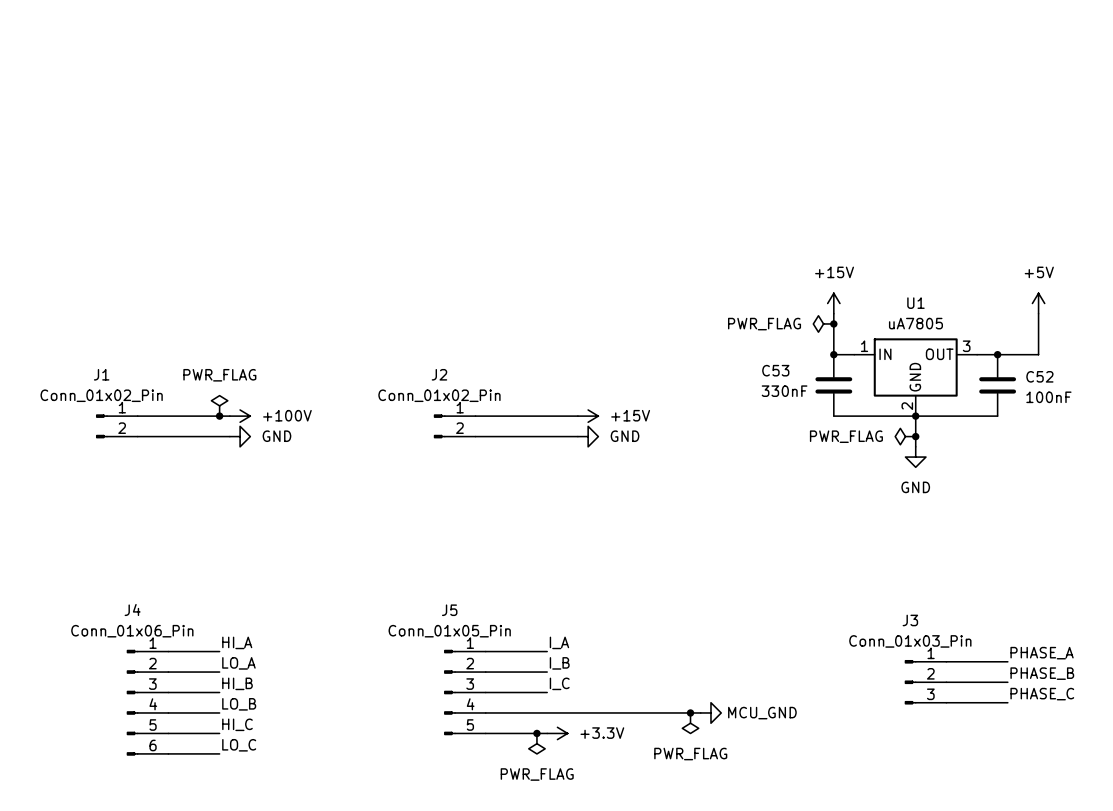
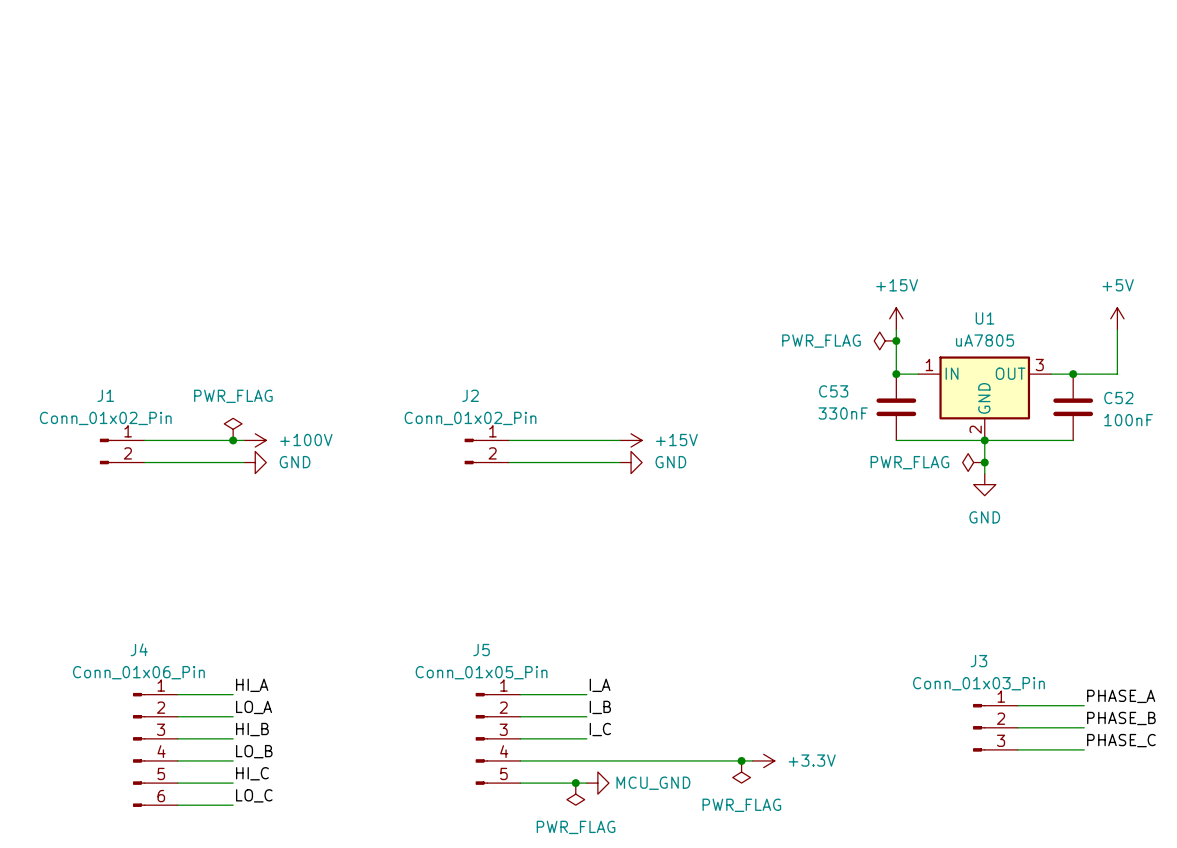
power symbol: MCU_GND (710, 712) -> +3.3V (763, 760)
power symbol: +3.3V (557, 733) -> MCU_GND (597, 783)

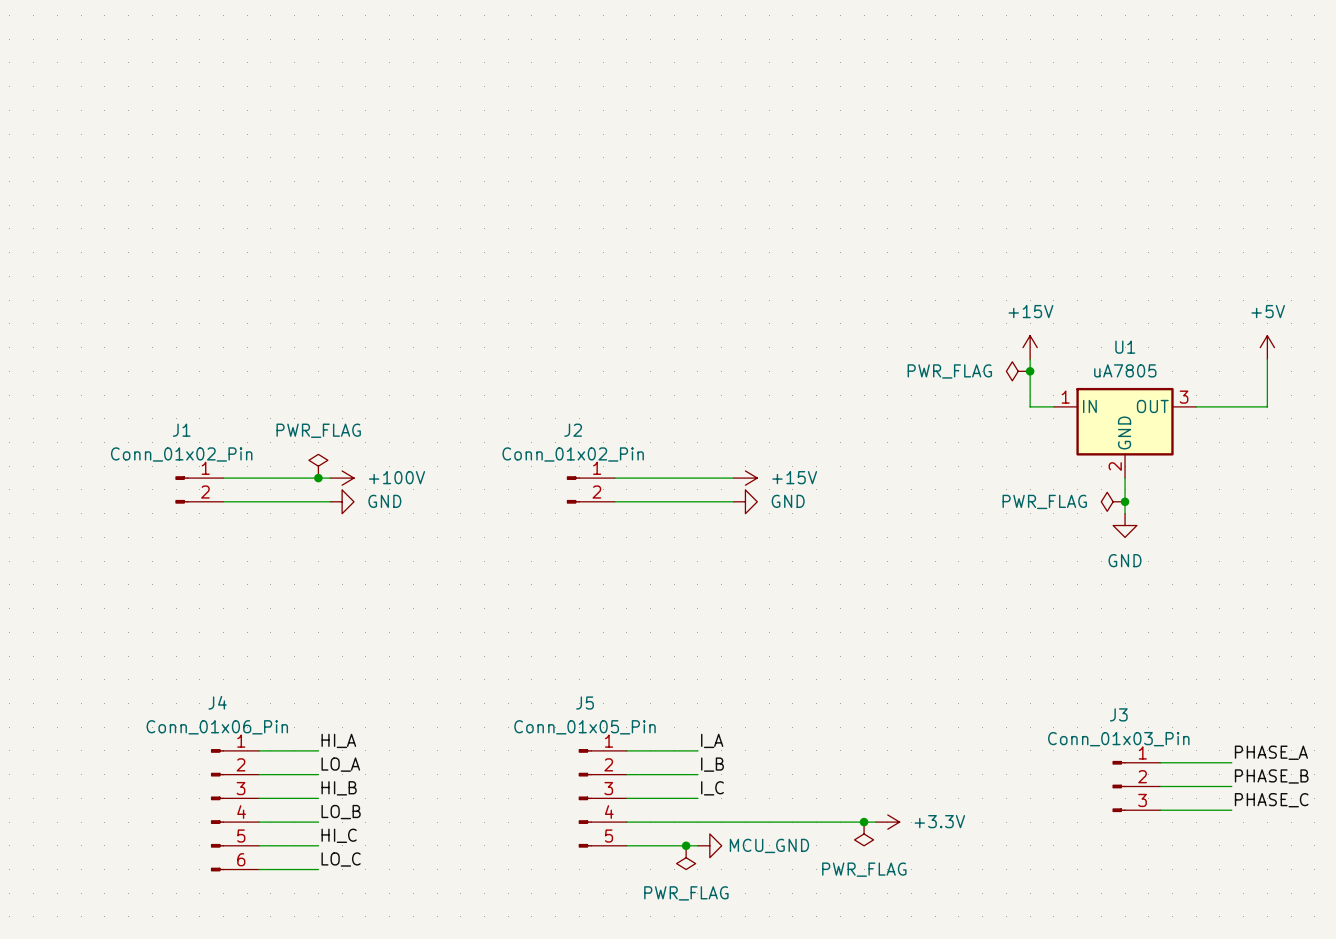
junction: (896, 374) -> none
junction: (1073, 374) -> none
C53: 330nF (896, 407) -> none
C52: 100nF (1073, 407) -> none
wire: (896, 440) (1073, 440) -> none
junction: (984, 440) -> none

